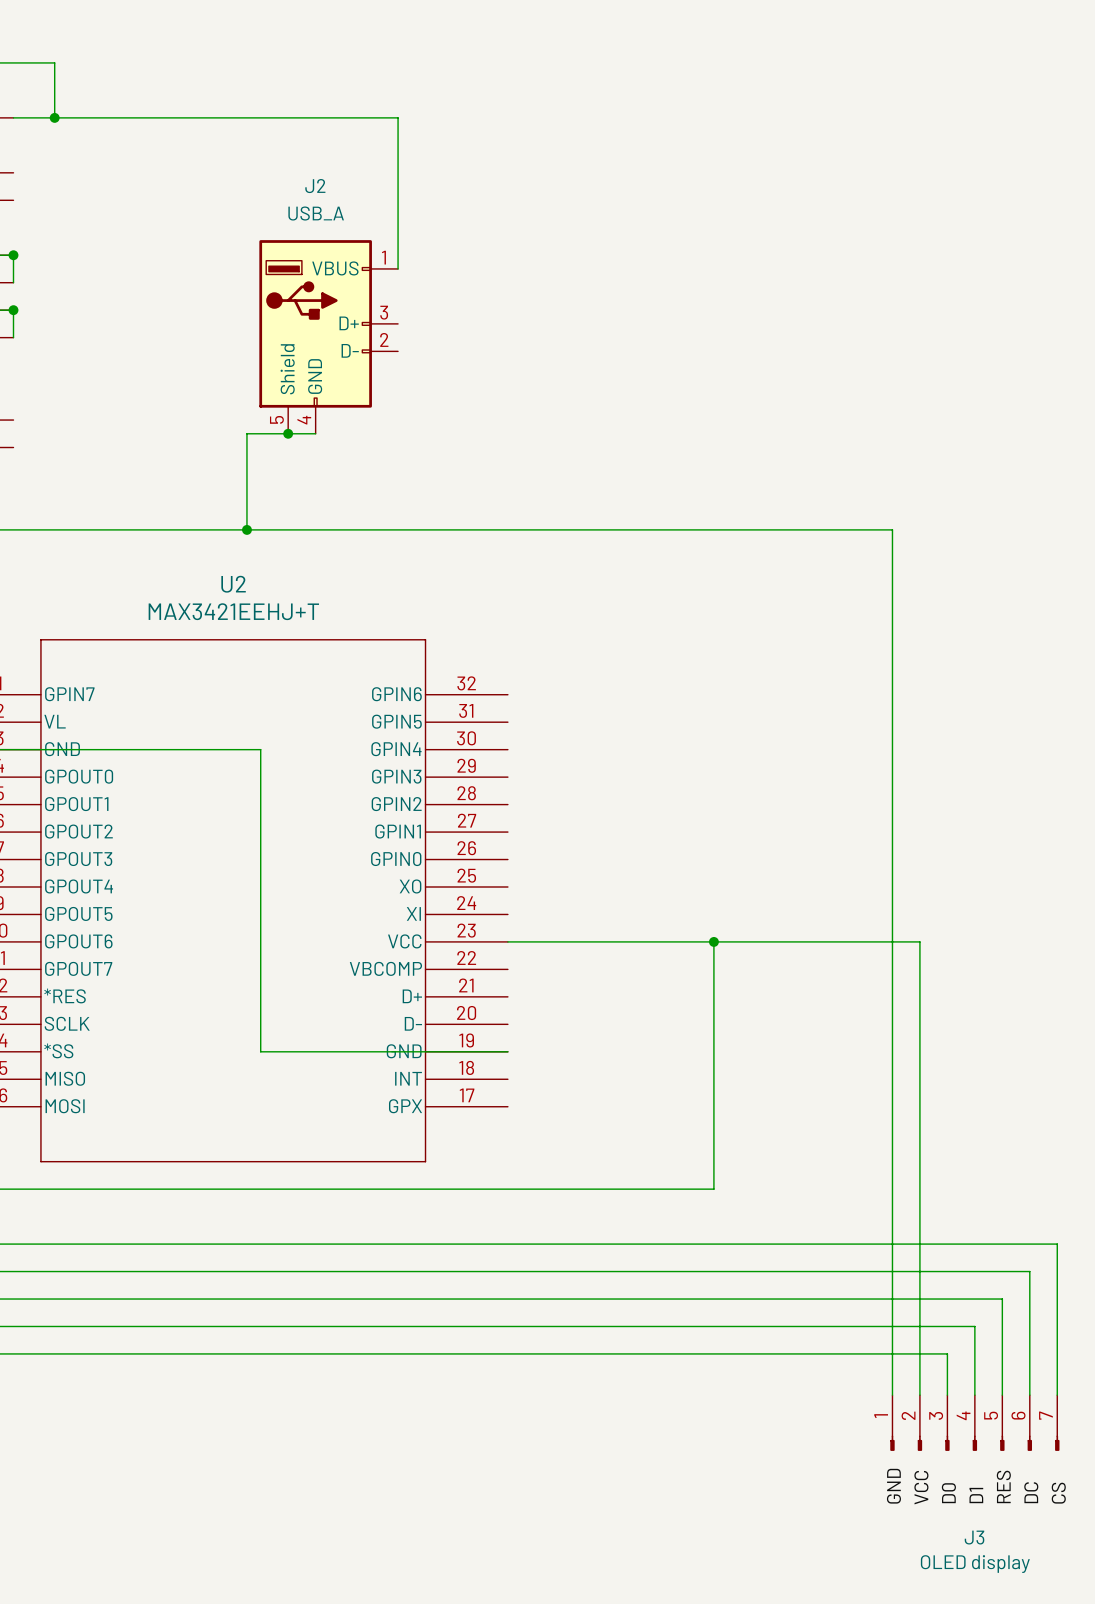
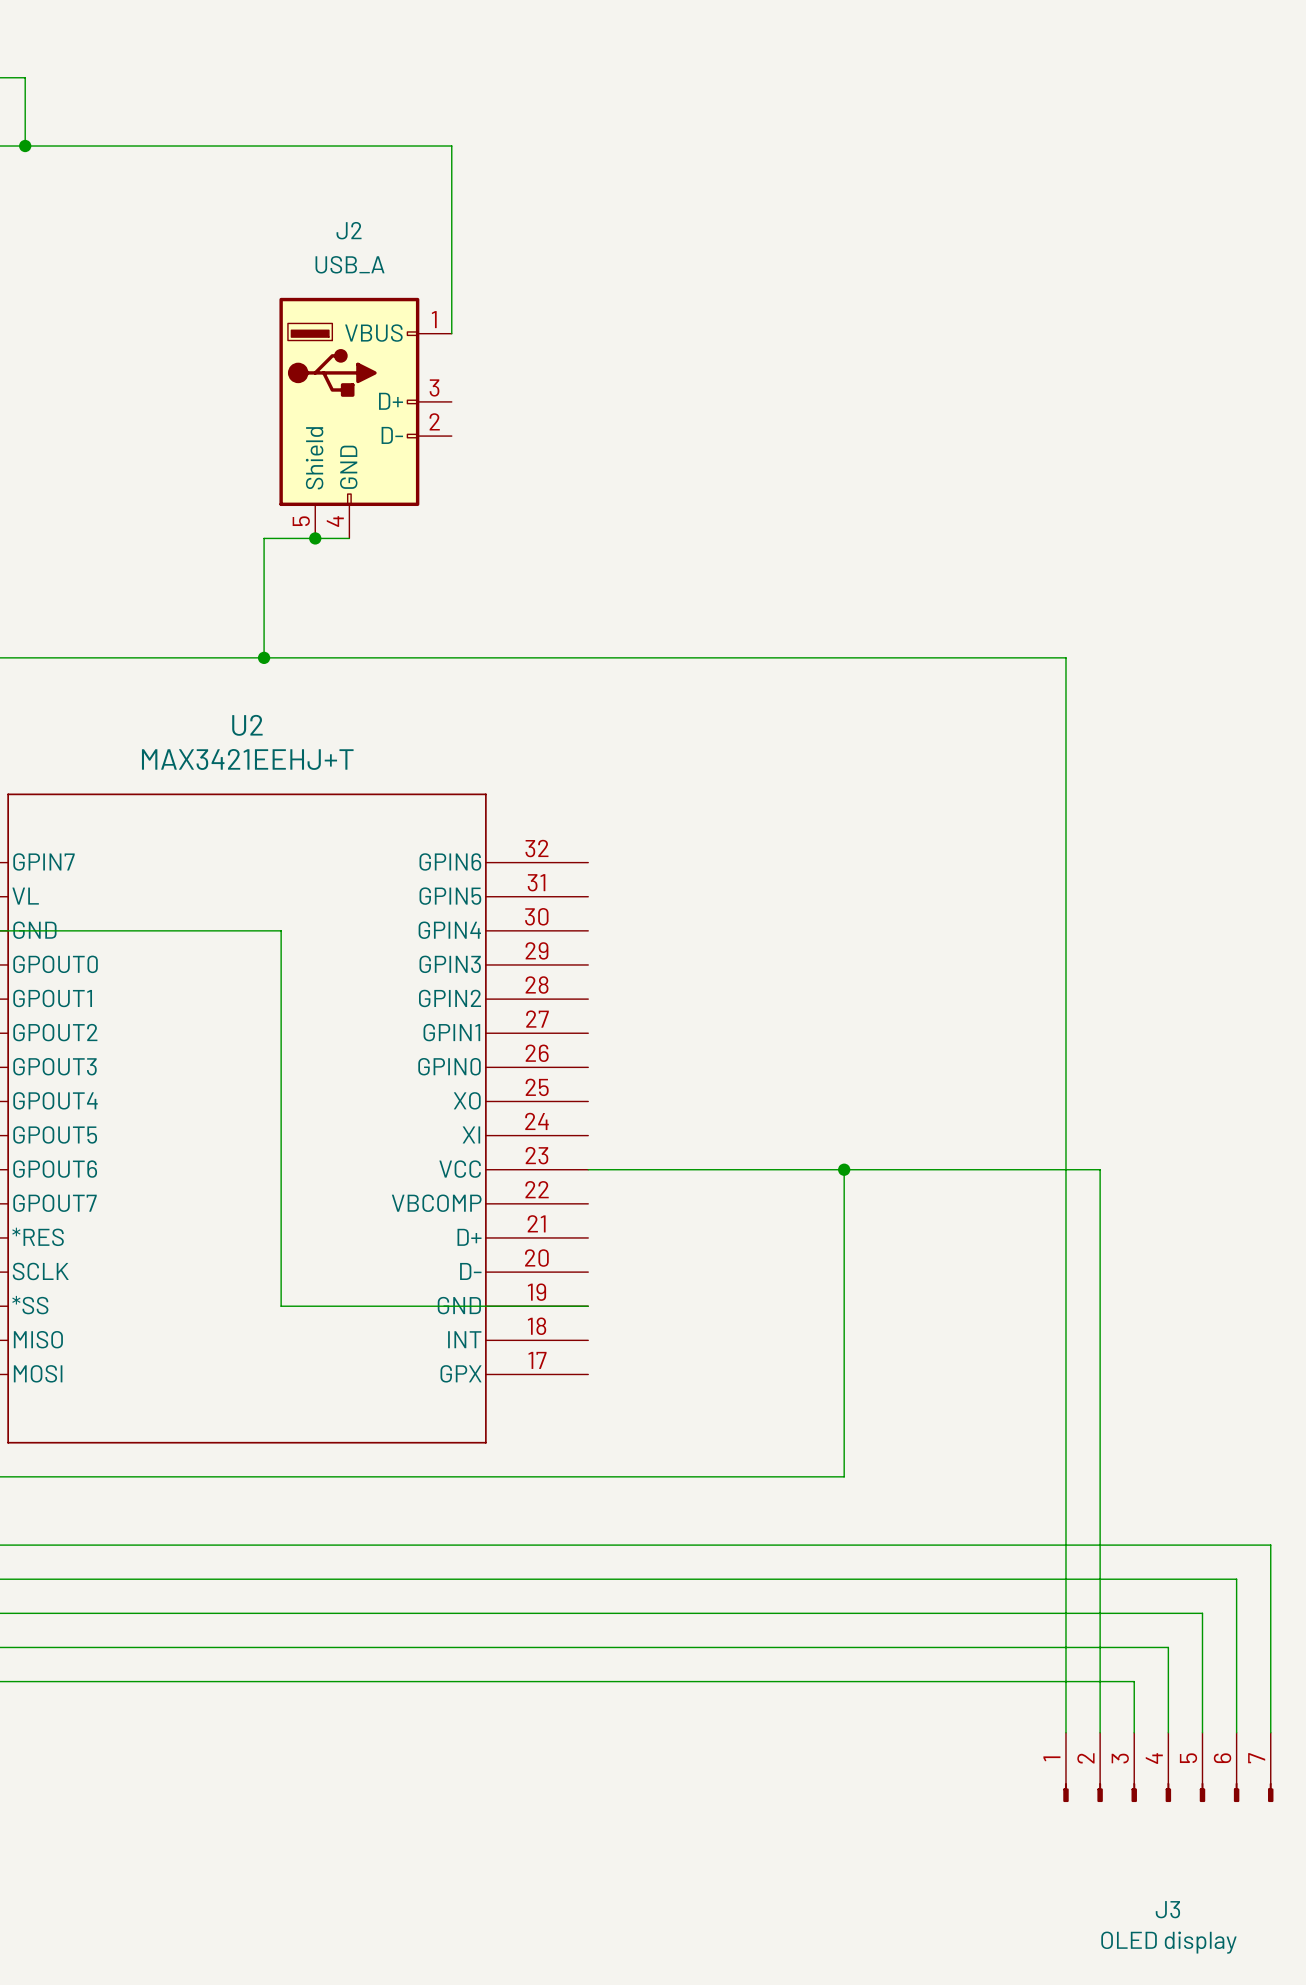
label: GND (893, 1486) -> none
label: RES (1003, 1486) -> none
label: VCC (921, 1487) -> none
label: DC (1031, 1492) -> none
label: D0 (948, 1493) -> none
label: CS (1058, 1493) -> none
label: D1 (976, 1495) -> none

